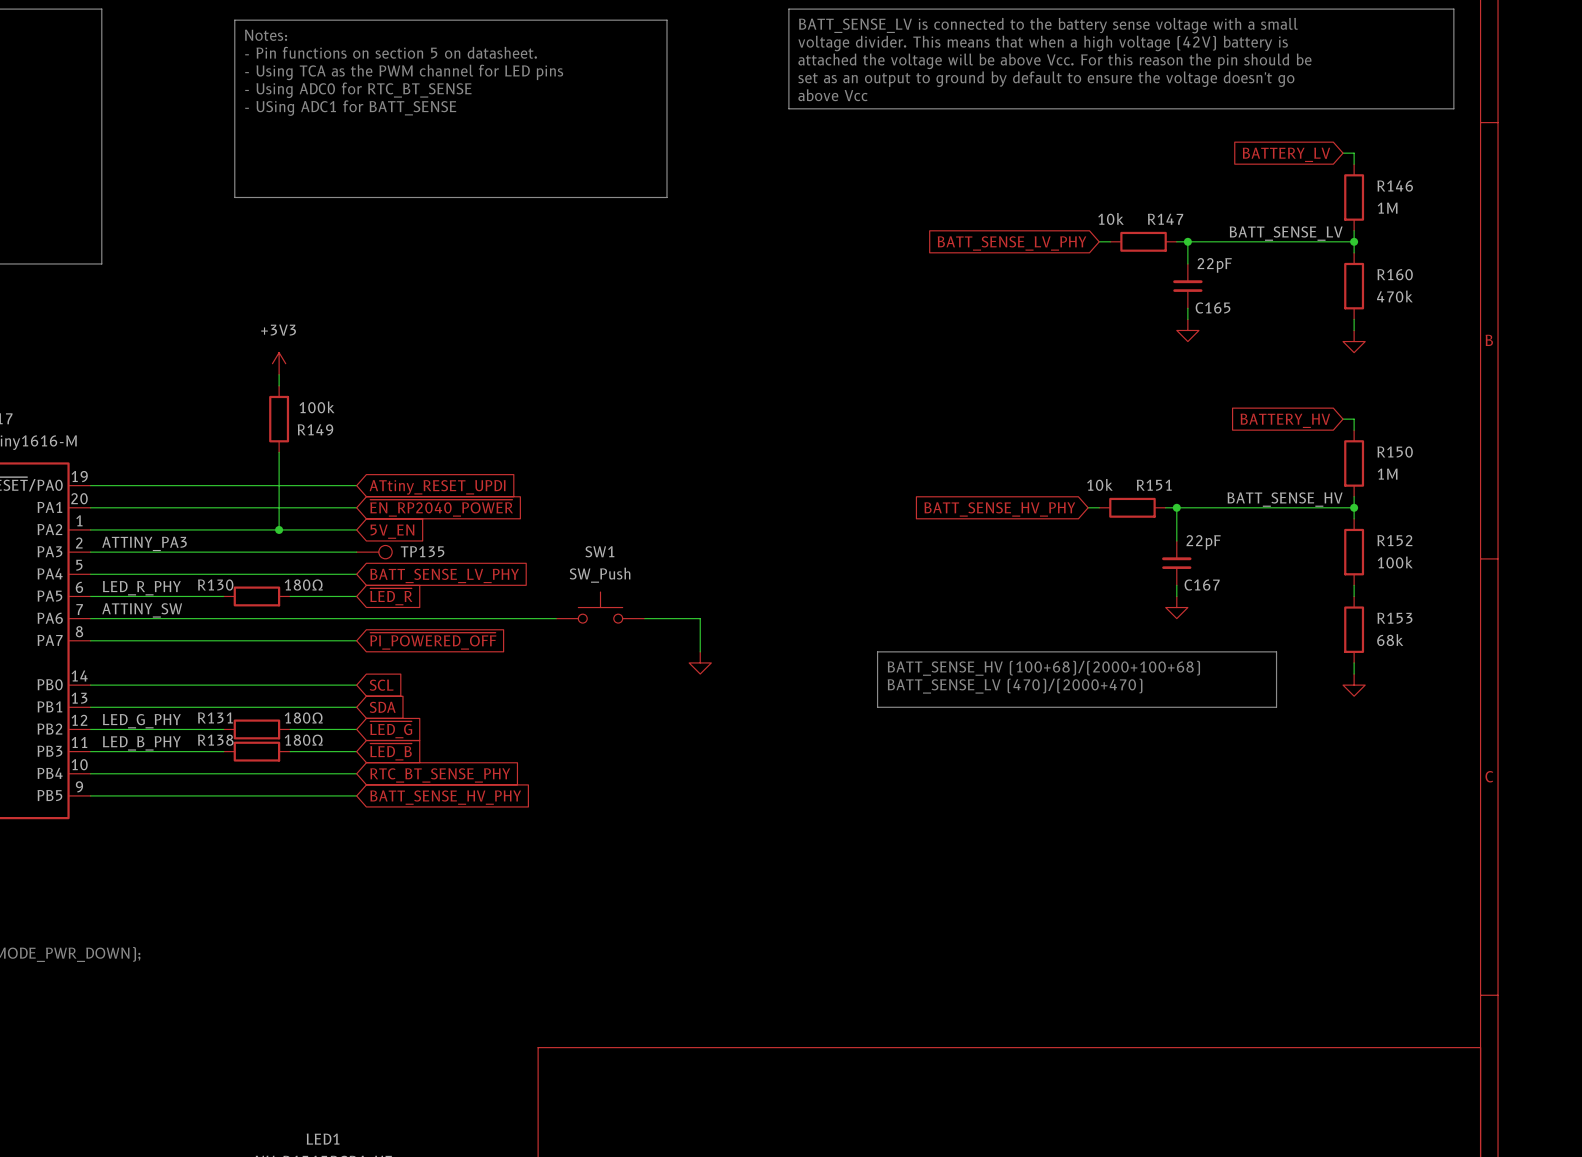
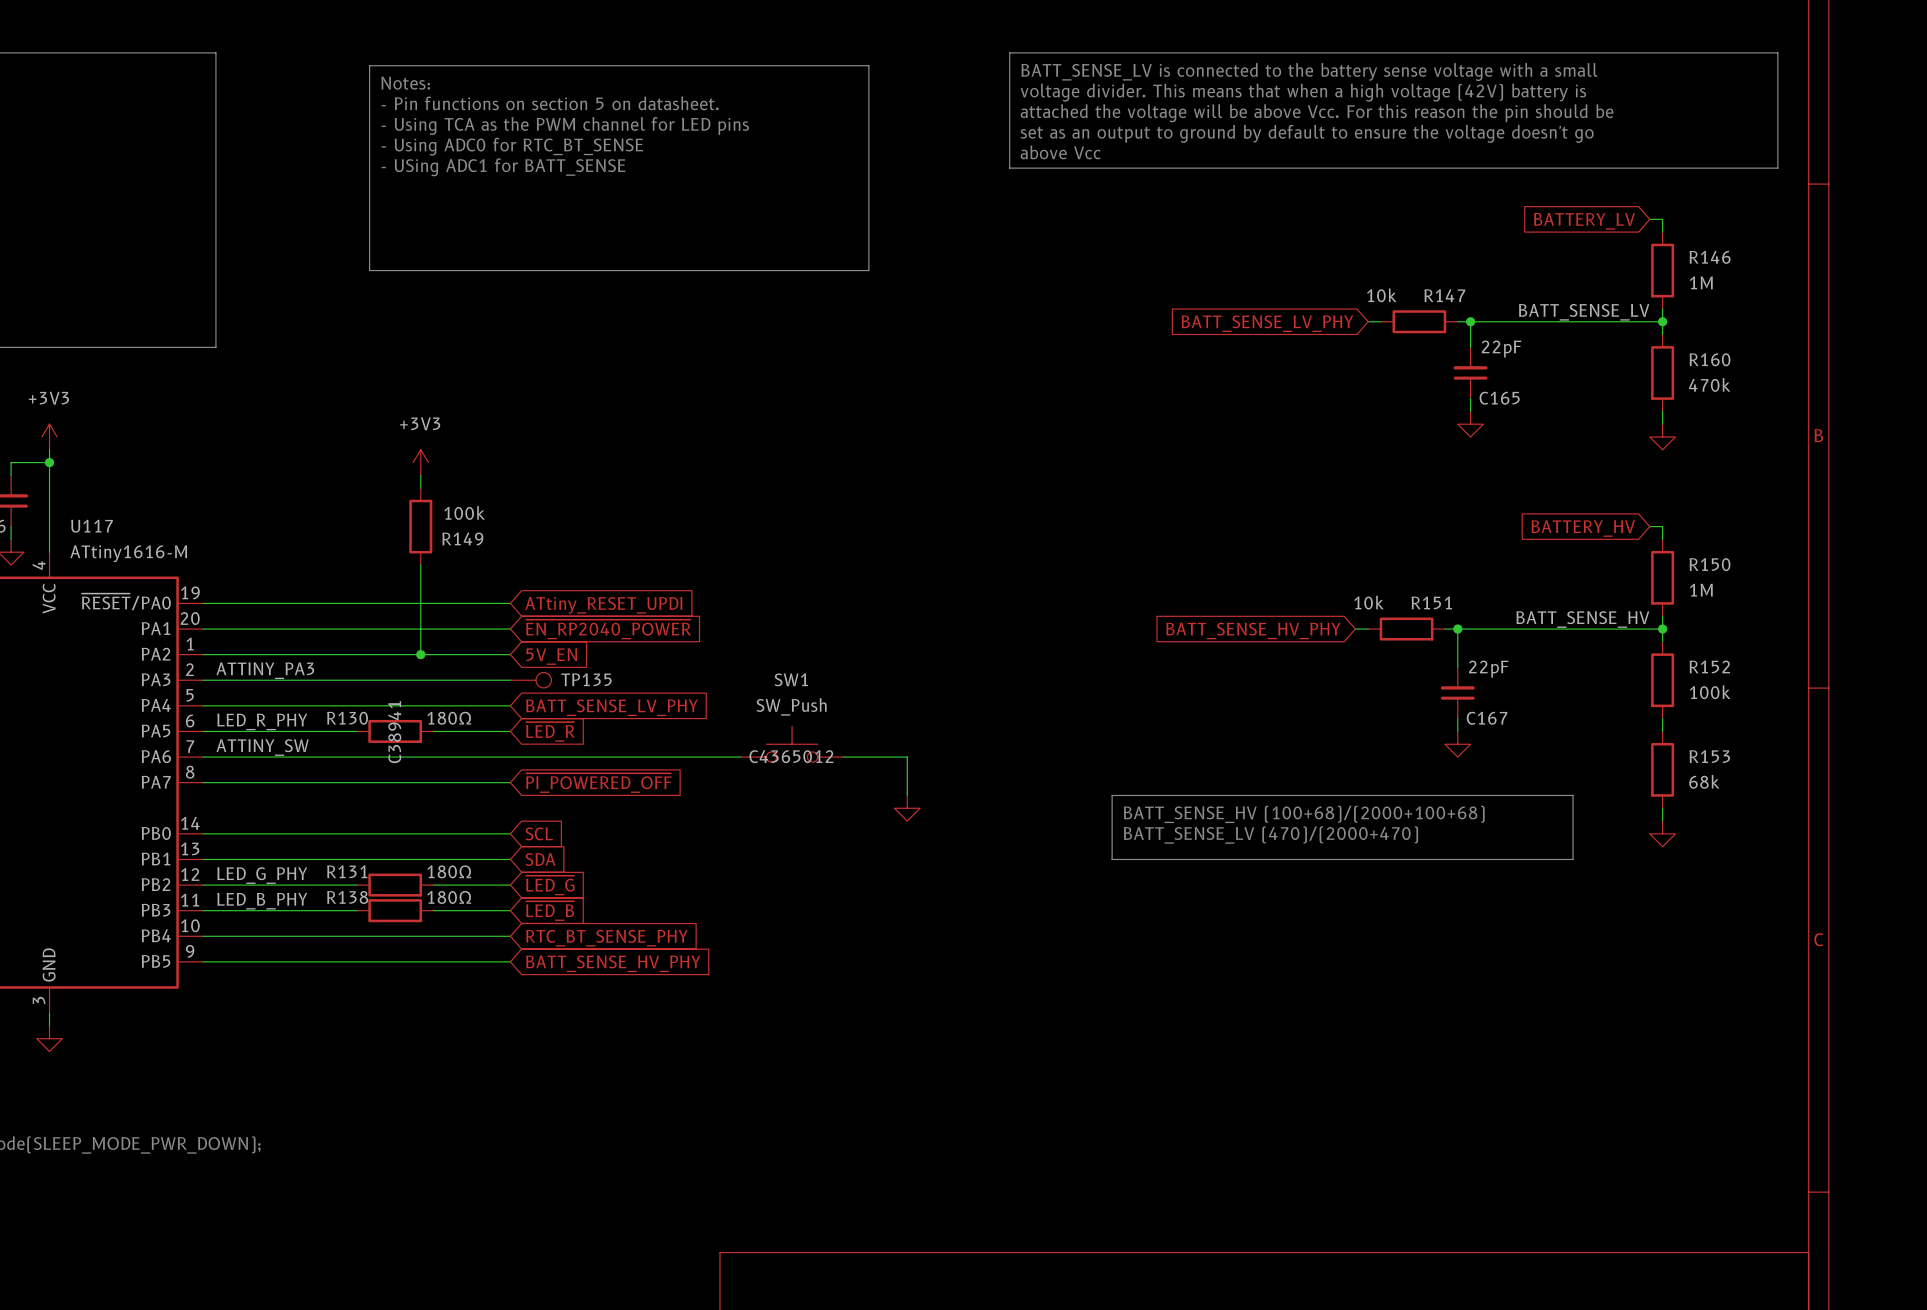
R130 text: none -> C38941 (394, 732)
SW1 text: none -> C4365012 (791, 756)

